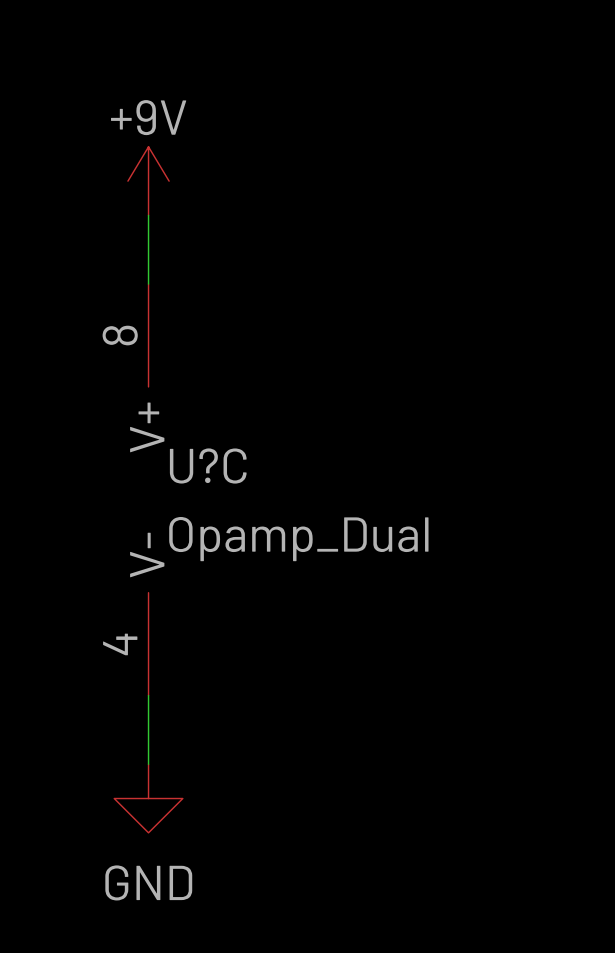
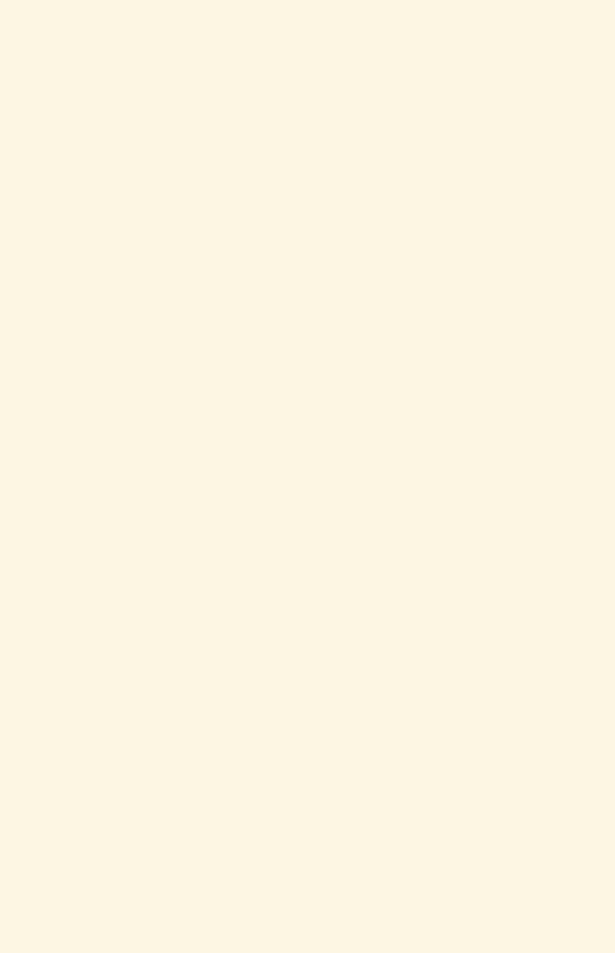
power symbol: +9V (148, 181) -> none
wire: (148, 215) (148, 284) -> none
U?C: Opamp_Dual (148, 489) -> none
wire: (148, 695) (148, 764) -> none
power symbol: GND (148, 798) -> none

